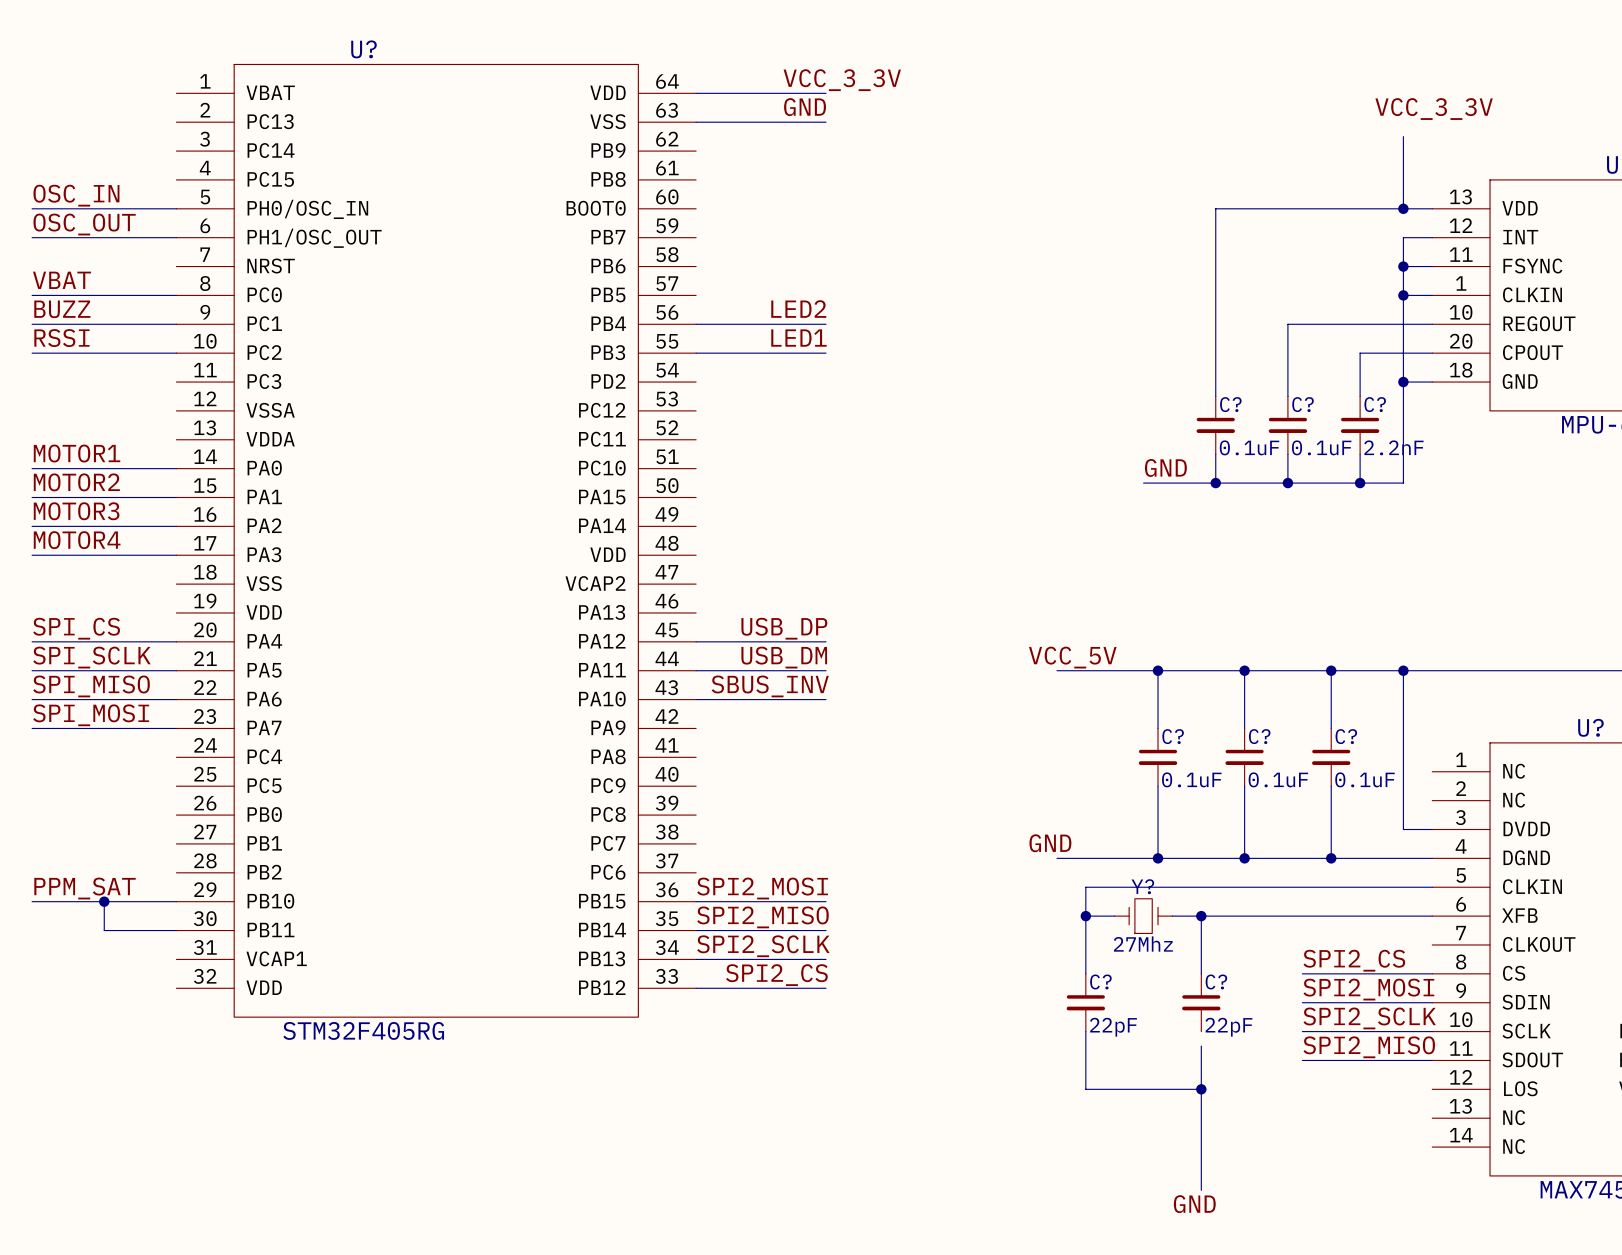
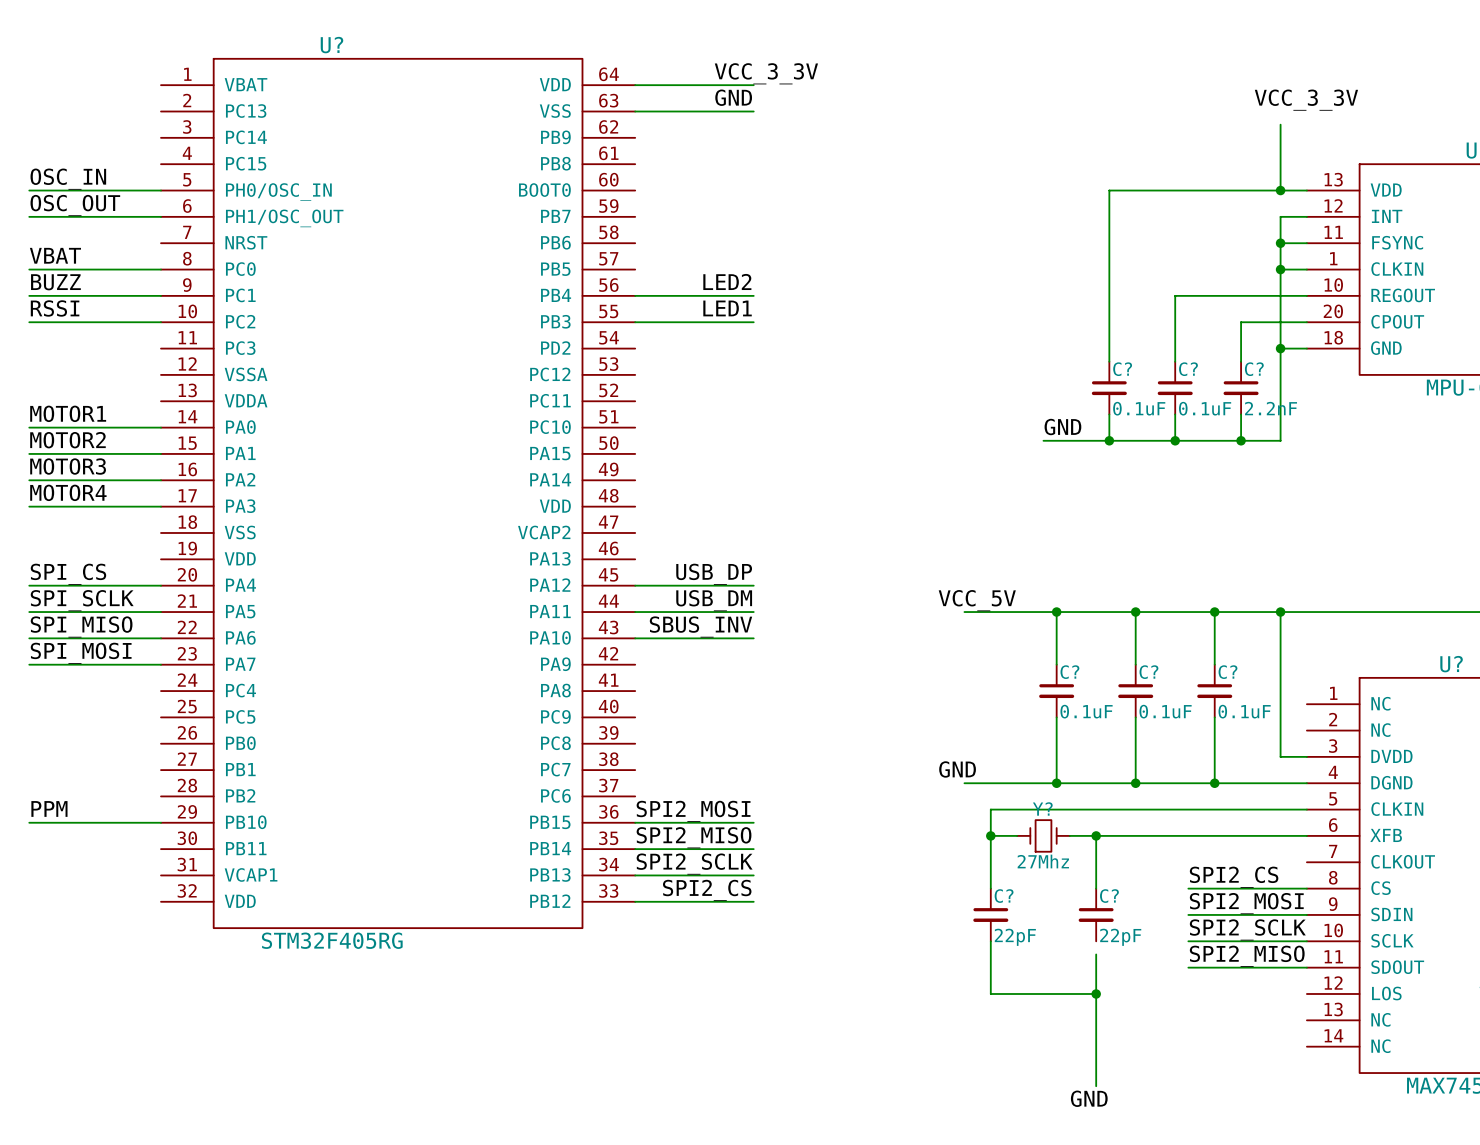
label: PPM_SAT (85, 888) -> PPM (49, 808)
wire: (104, 901) (104, 930) (176, 930) -> none
junction: (104, 901) -> none

